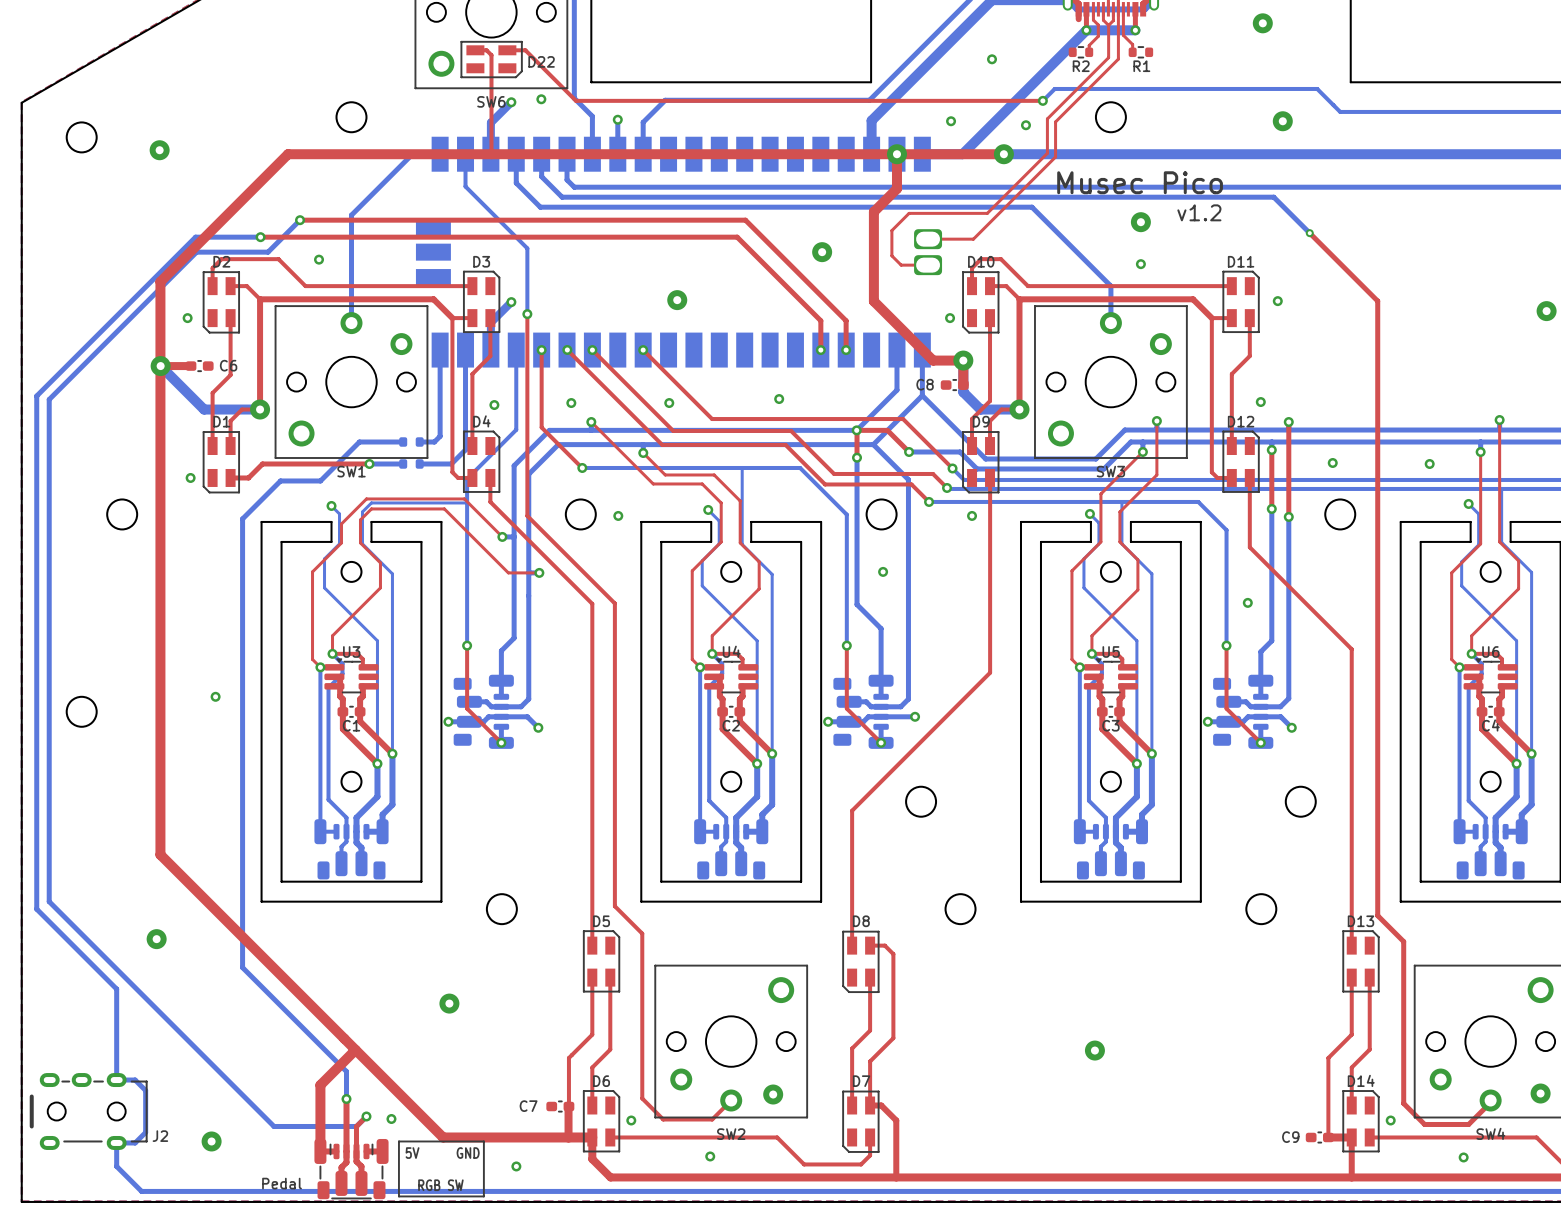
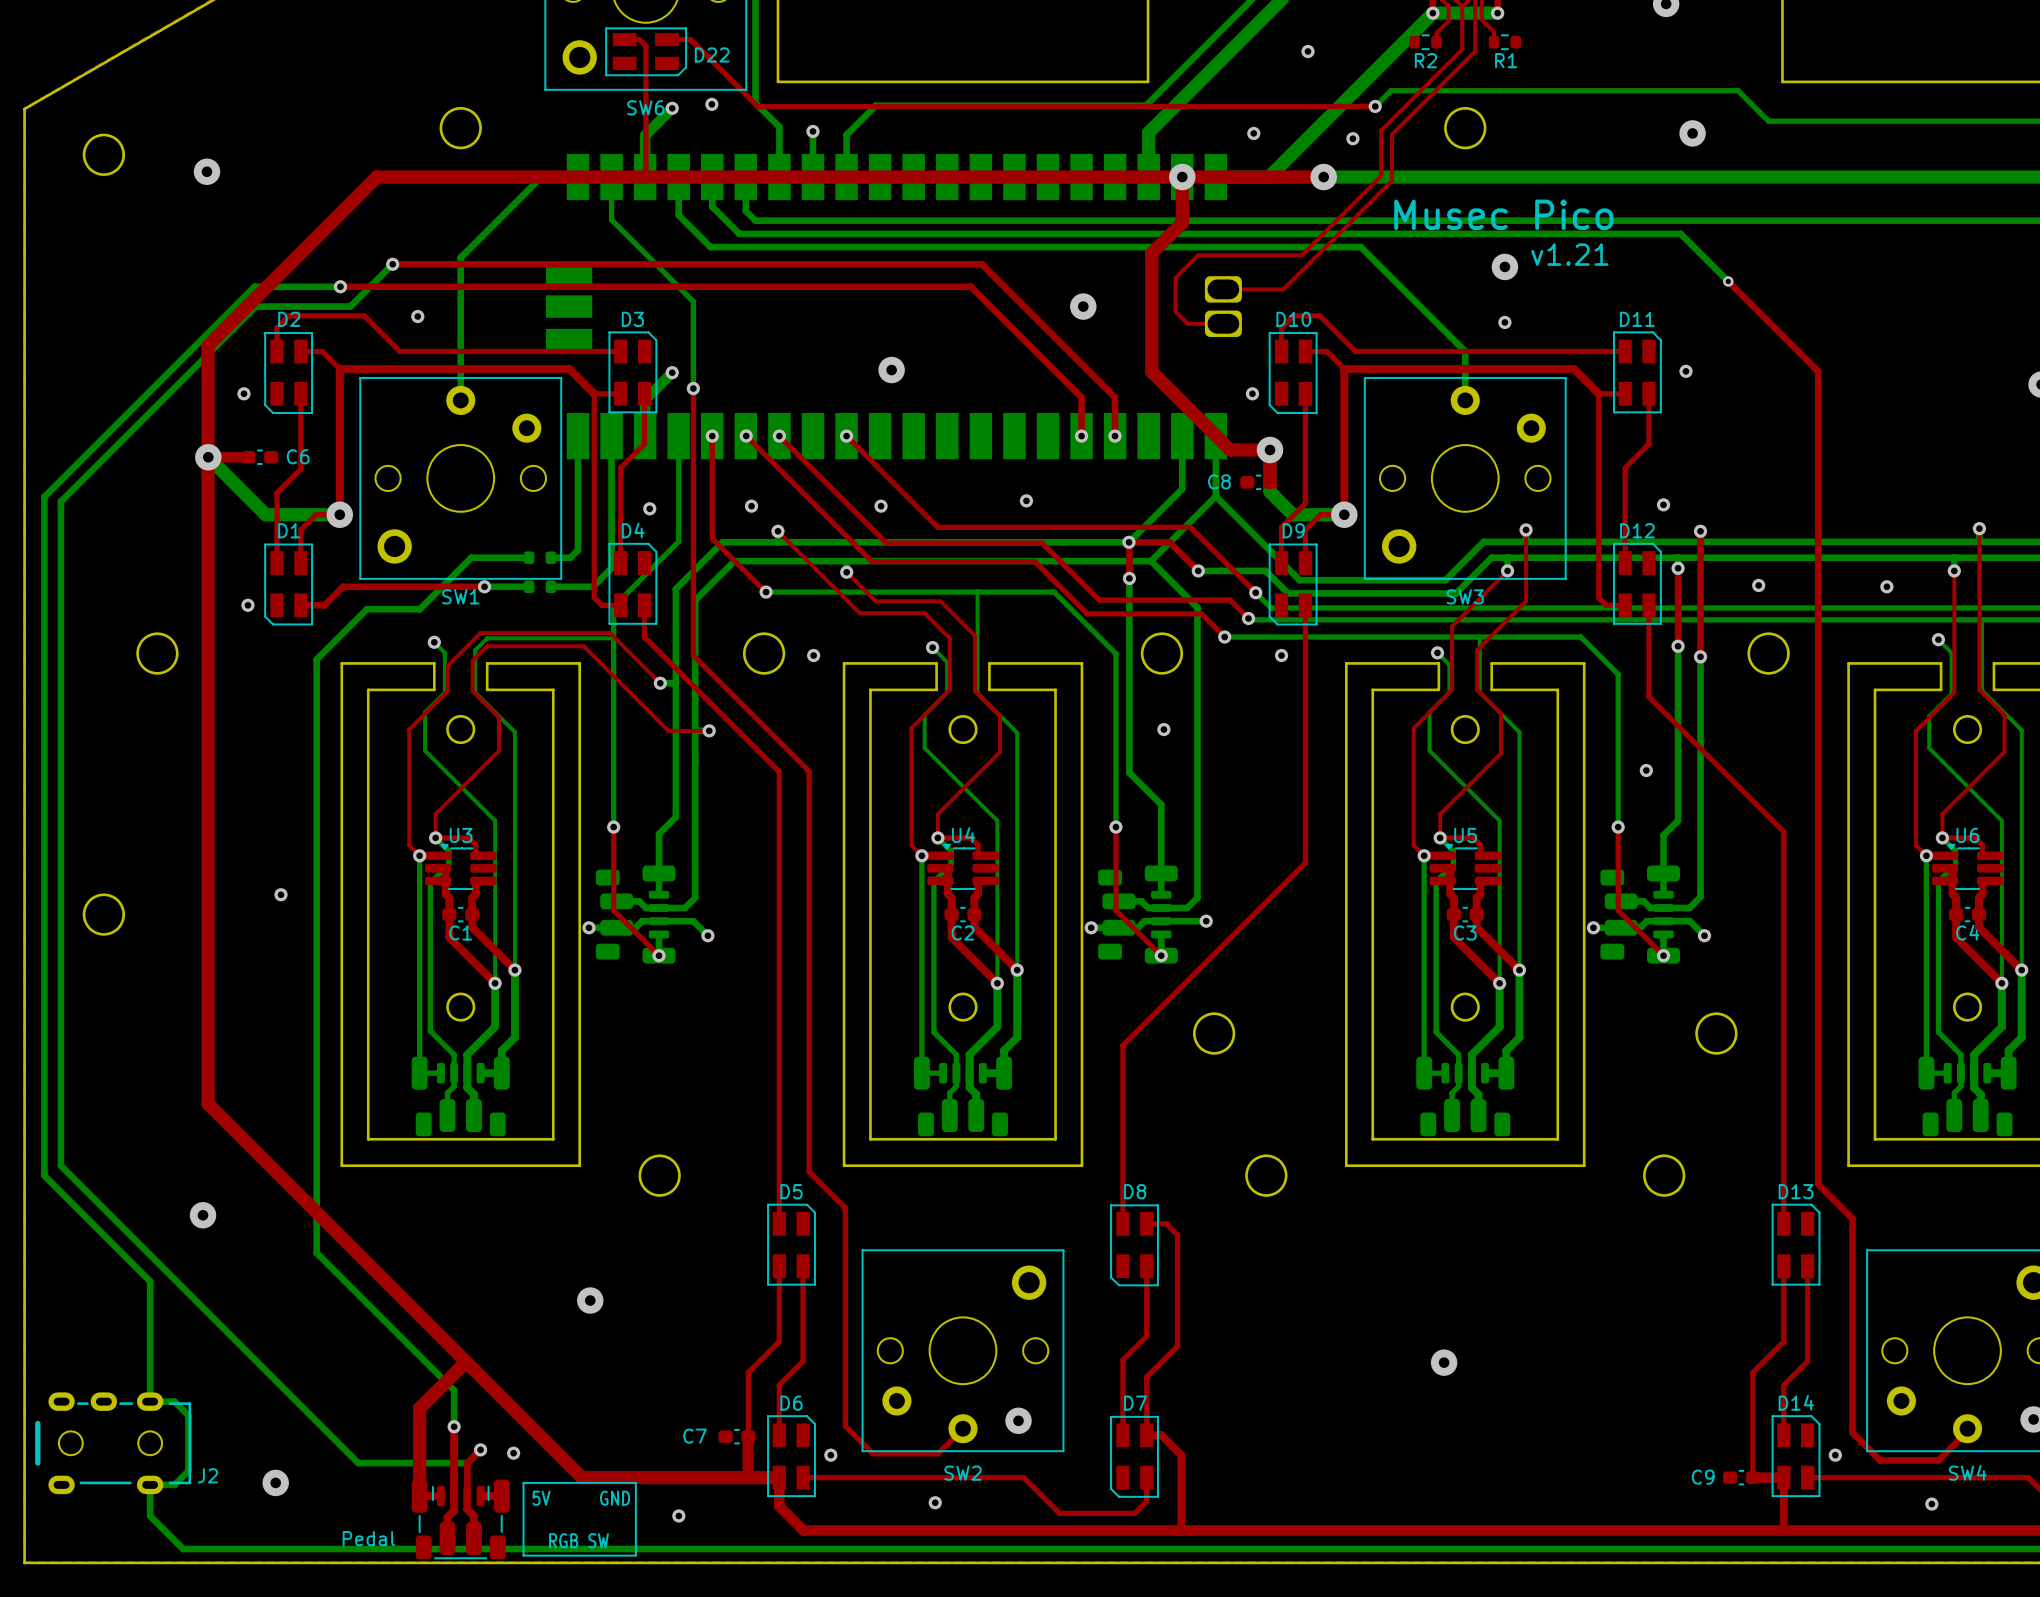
text: v1.2 (1199, 212) -> v1.21 (1569, 254)

